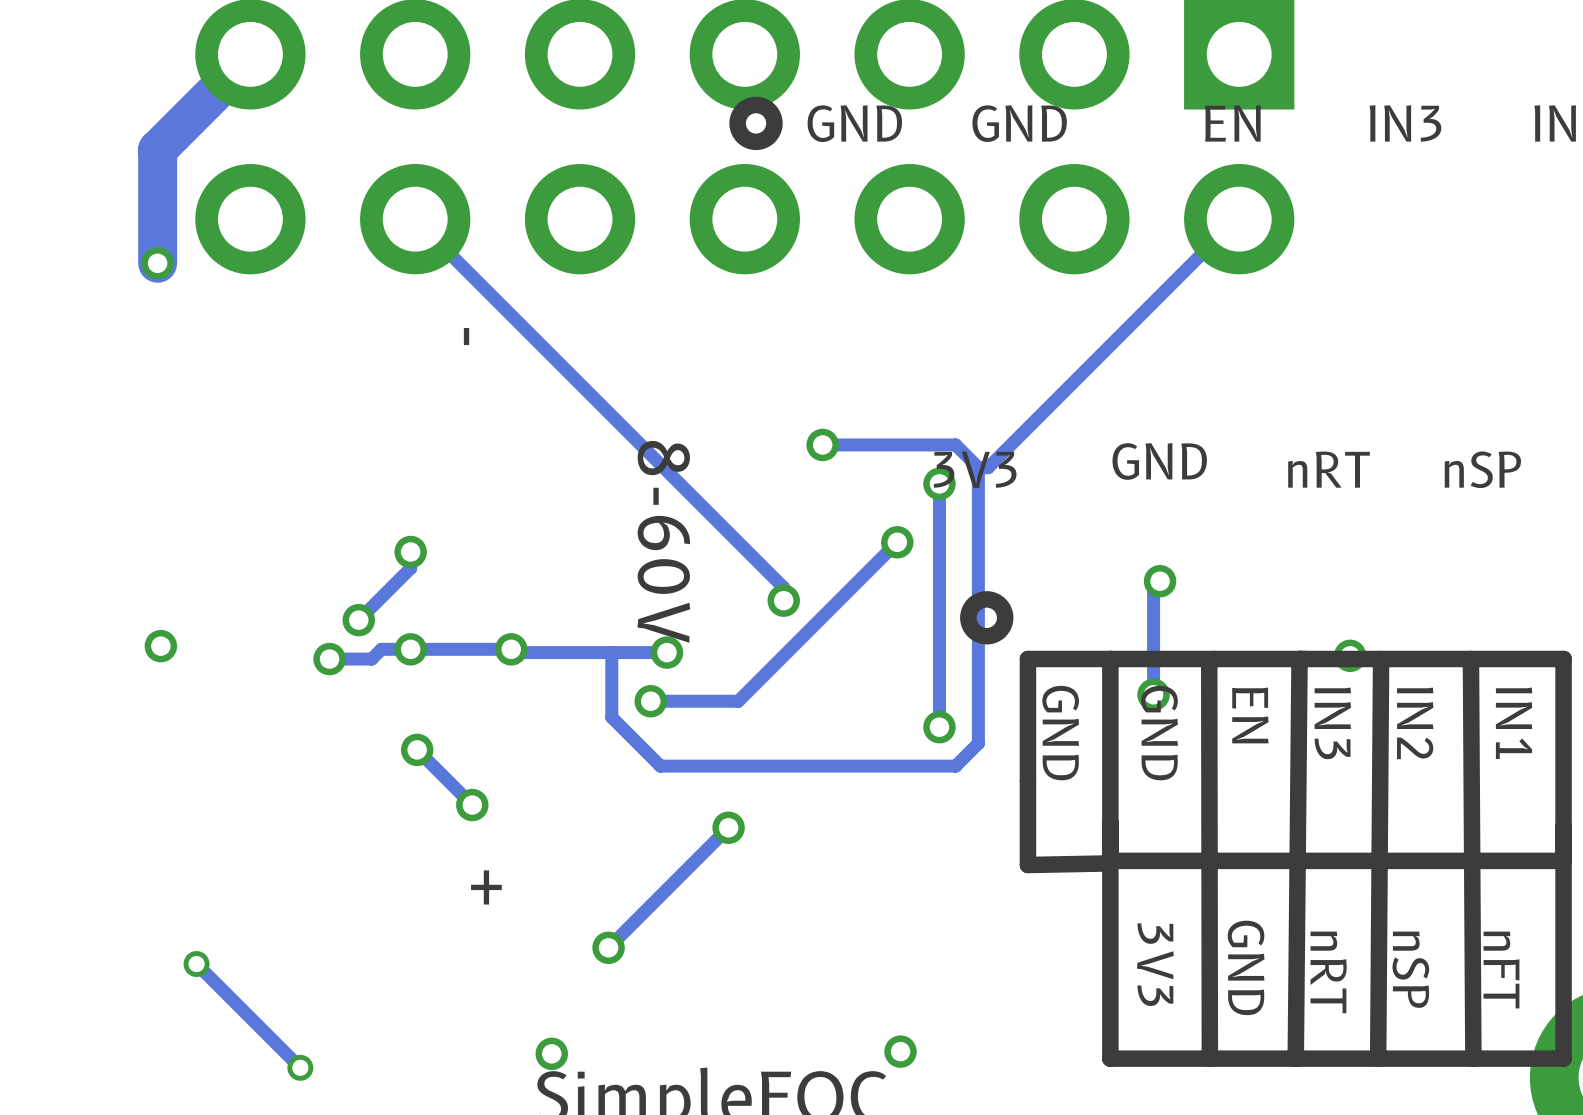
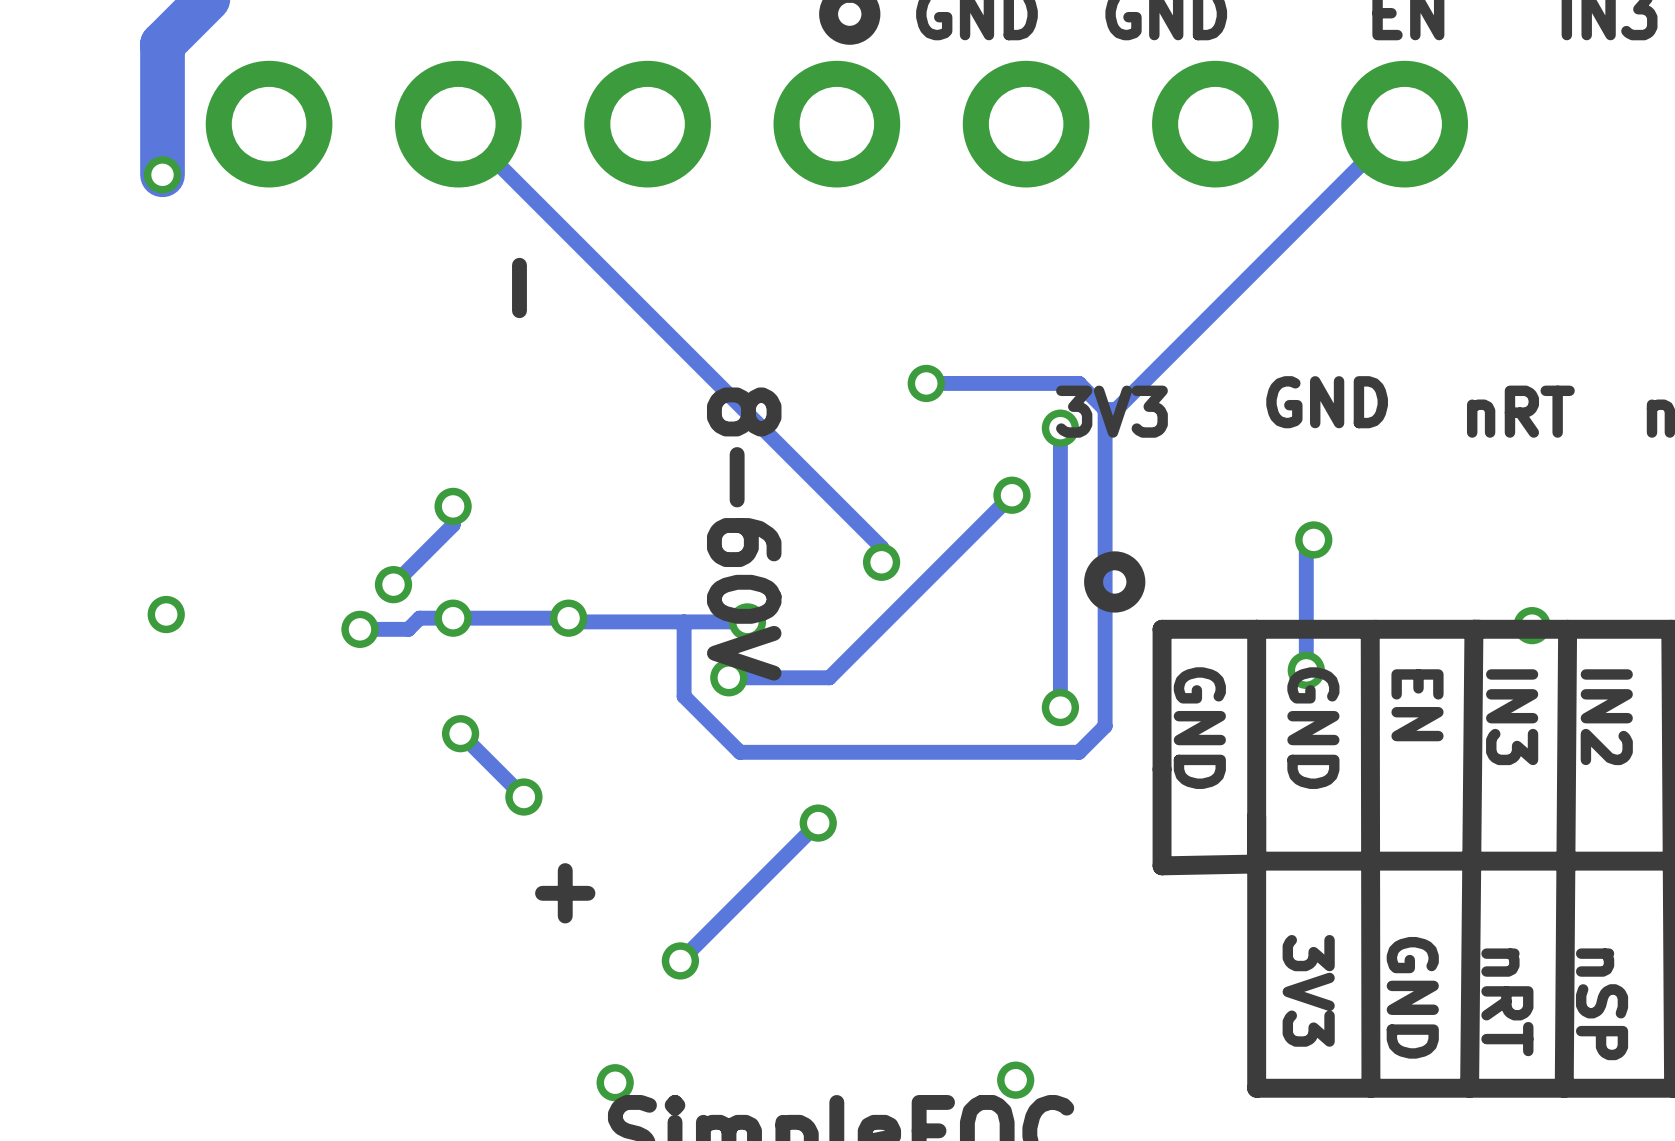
track: (196, 964) (300, 1067) -> none
via: (196, 964) -> none
via: (300, 1067) -> none

